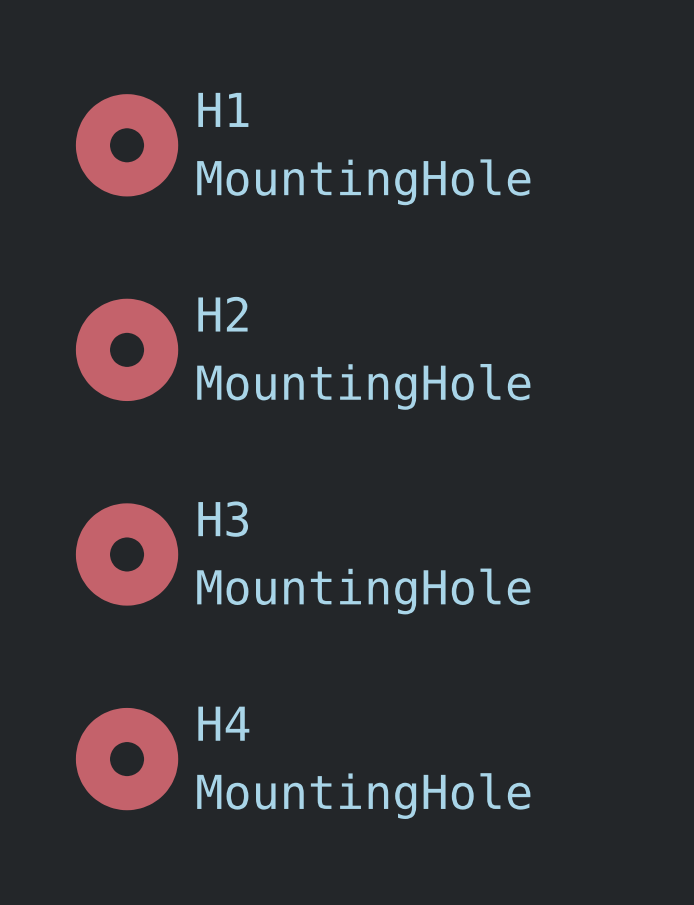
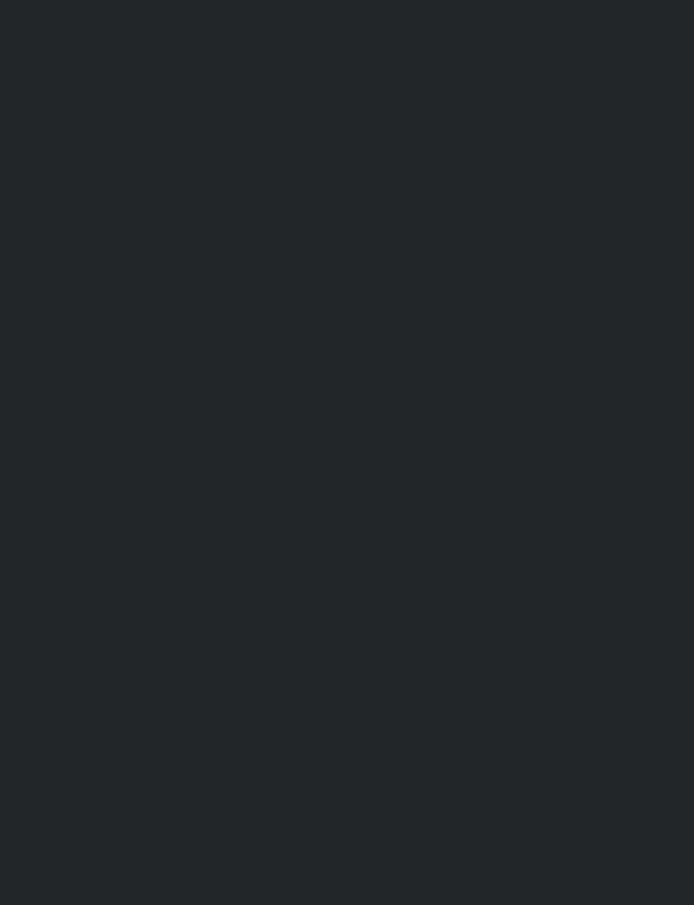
H1: MountingHole (127, 145) -> none
H2: MountingHole (127, 349) -> none
H3: MountingHole (127, 554) -> none
H4: MountingHole (127, 759) -> none

